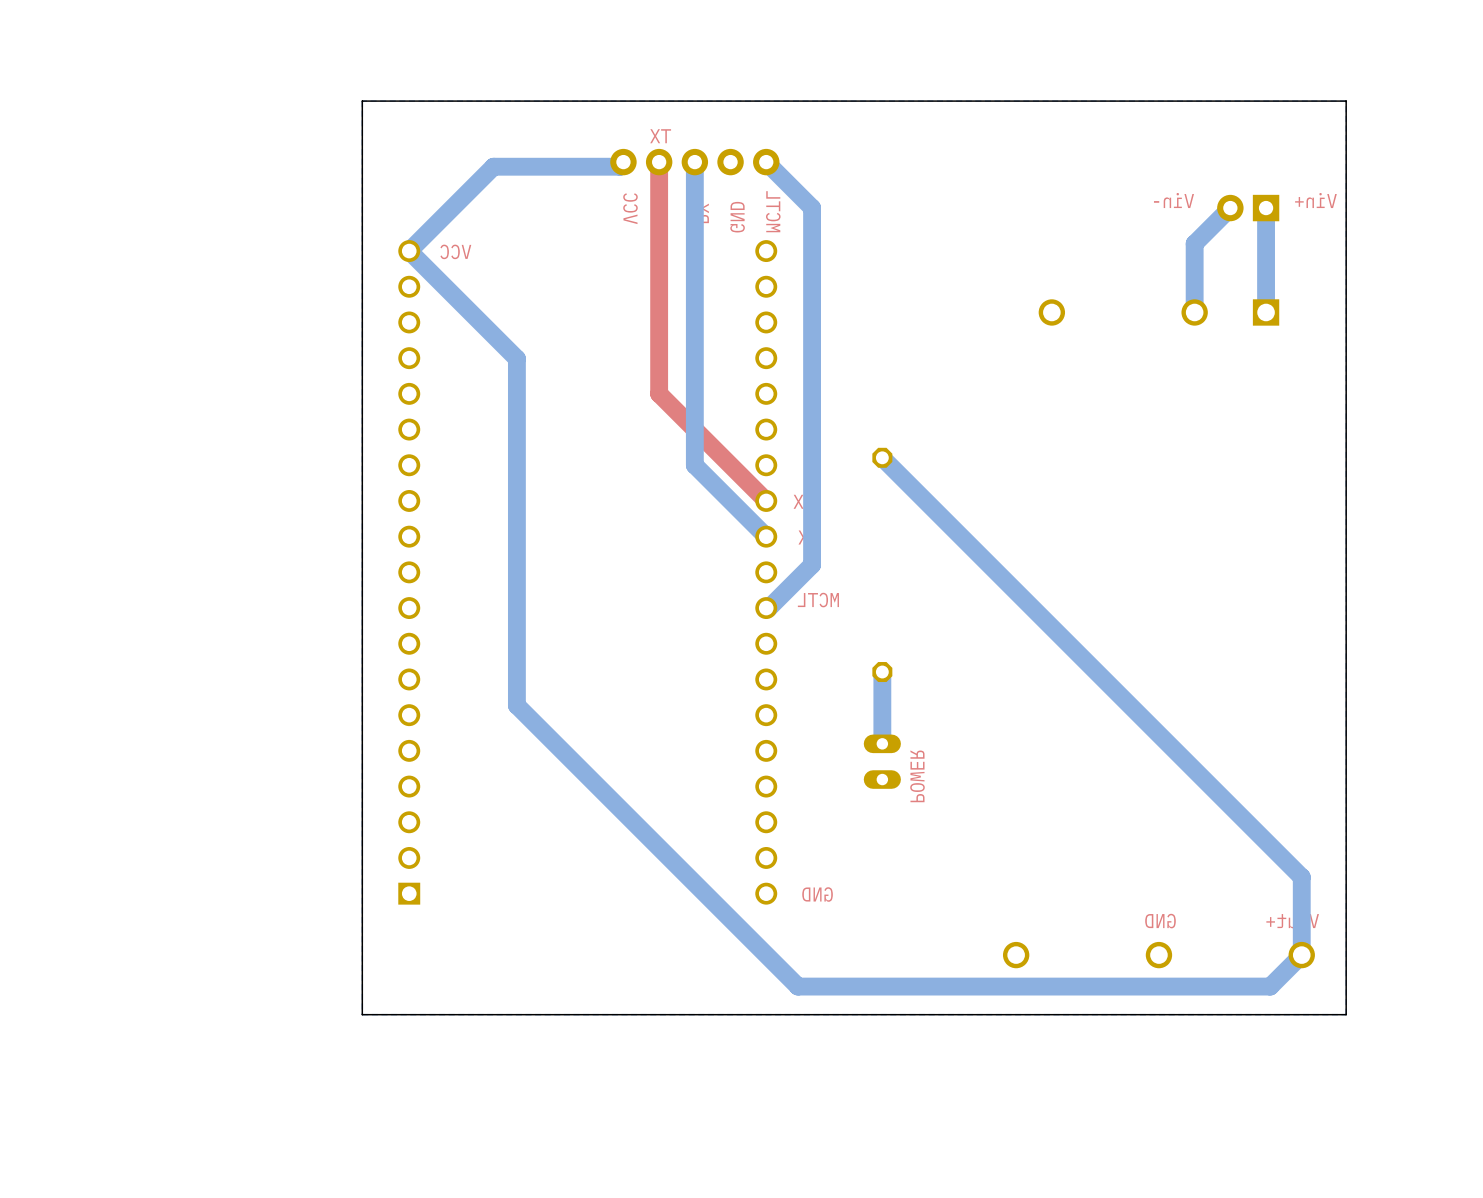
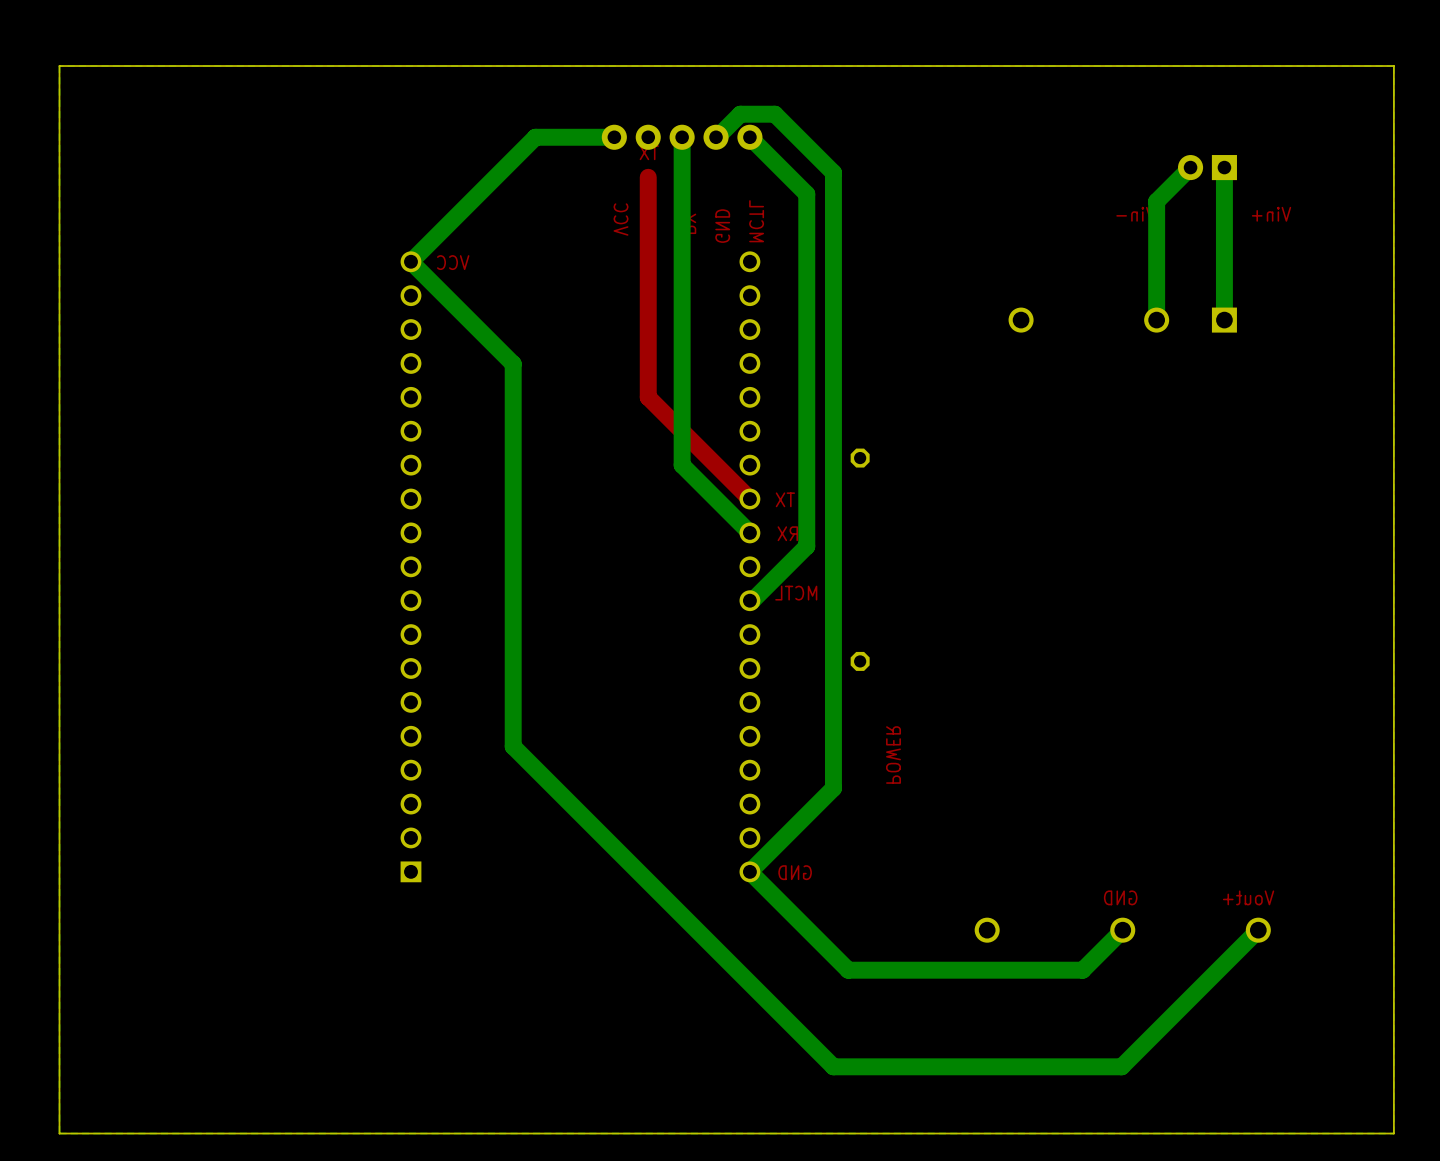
board edge: (1346, 101) (362, 101) (362, 1014) (1346, 1014) (1346, 101) -> (1393, 66) (1393, 1133) (59, 1133) (59, 66) (1393, 66)
bottom track: none -> (682, 137) (682, 177)
bottom track: none -> (716, 137) (740, 114) (774, 114) (833, 172) (833, 788) (749, 871) (848, 970) (1082, 970) (1122, 930)
bottom track: none -> (1224, 167) (1224, 220)
bottom track: (623, 162) (620, 166) (493, 166) -> (614, 137) (535, 137) (491, 181)
part position: (694, 162) -> (682, 137)
bottom track: (766, 162) (812, 207) (812, 564) -> (749, 137) (806, 194) (806, 546) (793, 559)
bottom track: (1230, 208) (1194, 243) -> (1190, 167) (1156, 201) (1156, 254)
part position: (1248, 208) -> (1207, 167)
bottom track: (882, 457) (1301, 877) (1301, 955) -> none
bottom track: (882, 672) (882, 743) -> none
bottom track: (516, 705) (798, 986) (1270, 986) -> (513, 693) (513, 746) (833, 1066) (1121, 1066) (1228, 960)
part: (882, 761) -> none

